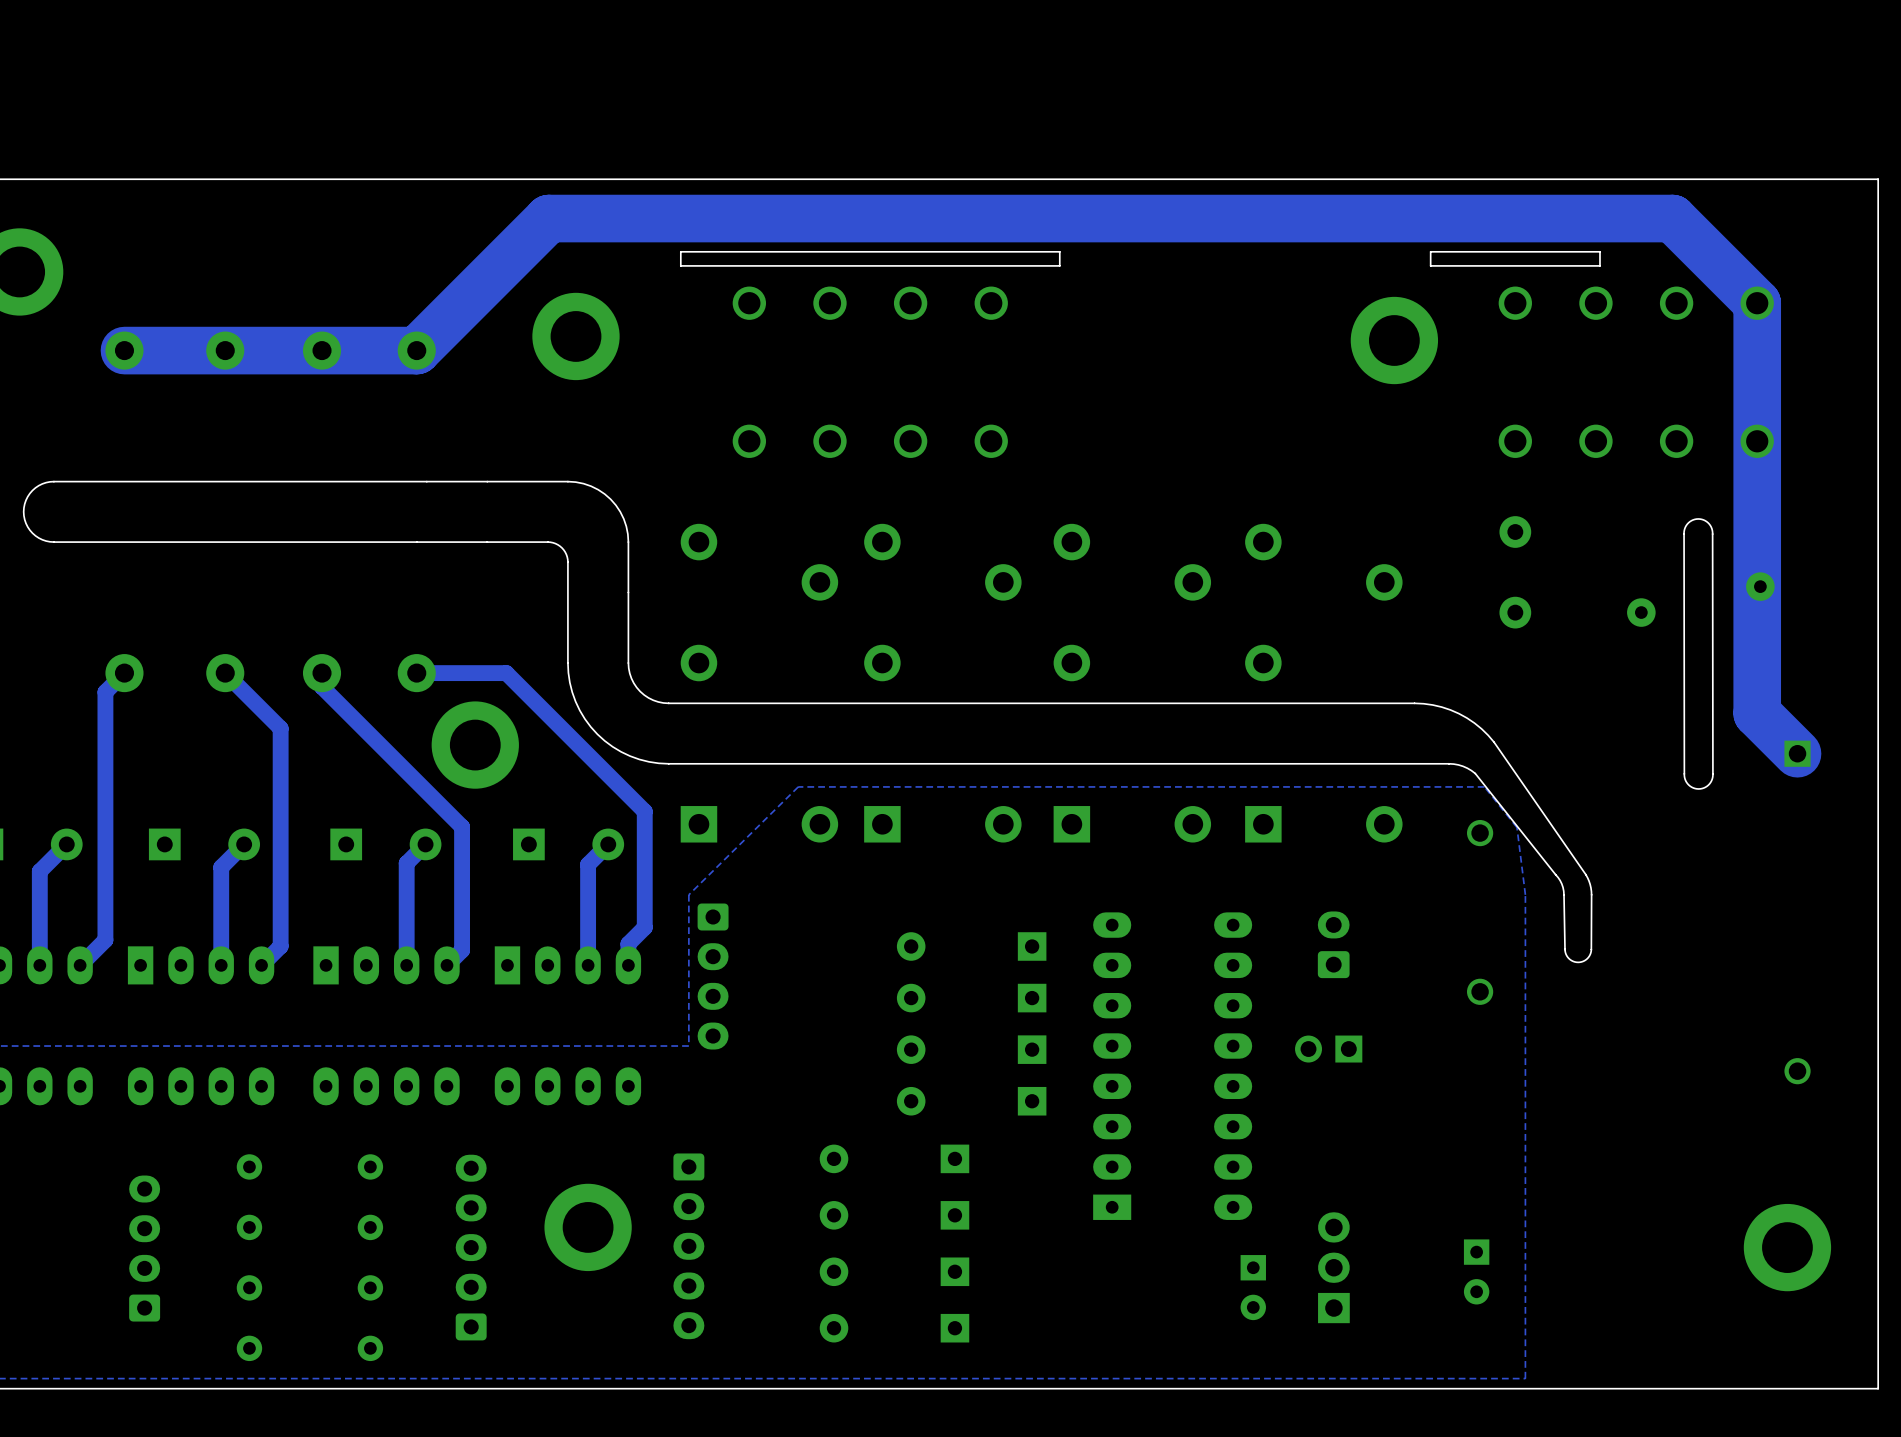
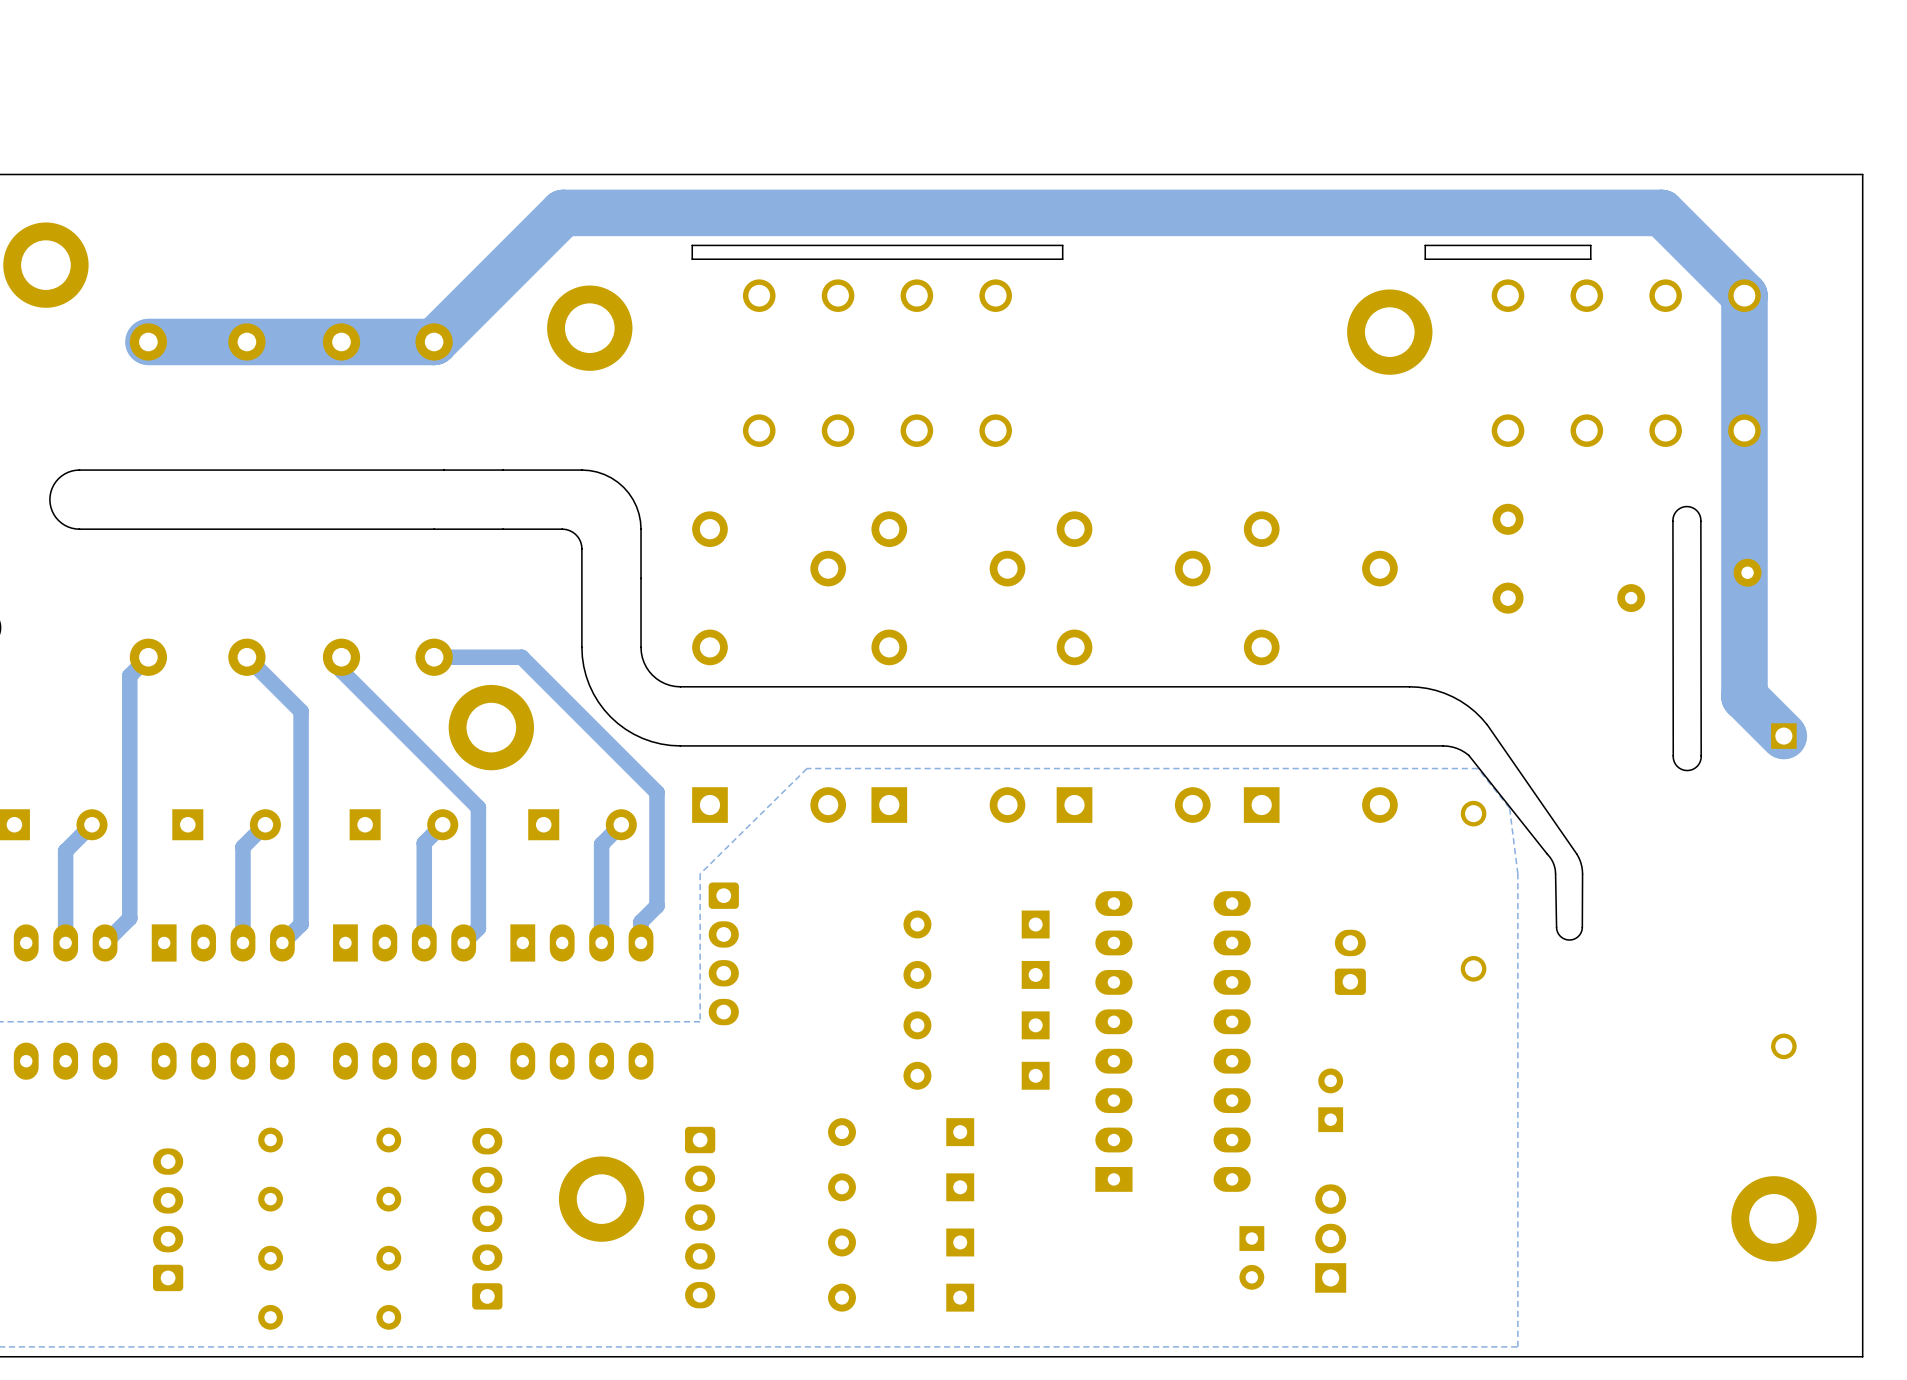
part position: (1333, 944) -> (1350, 962)
part: (1328, 1049) -> none
part rotation: 0° (1476, 1271) -> 180° (1330, 1100)
part position: (1476, 1271) -> (1330, 1100)

